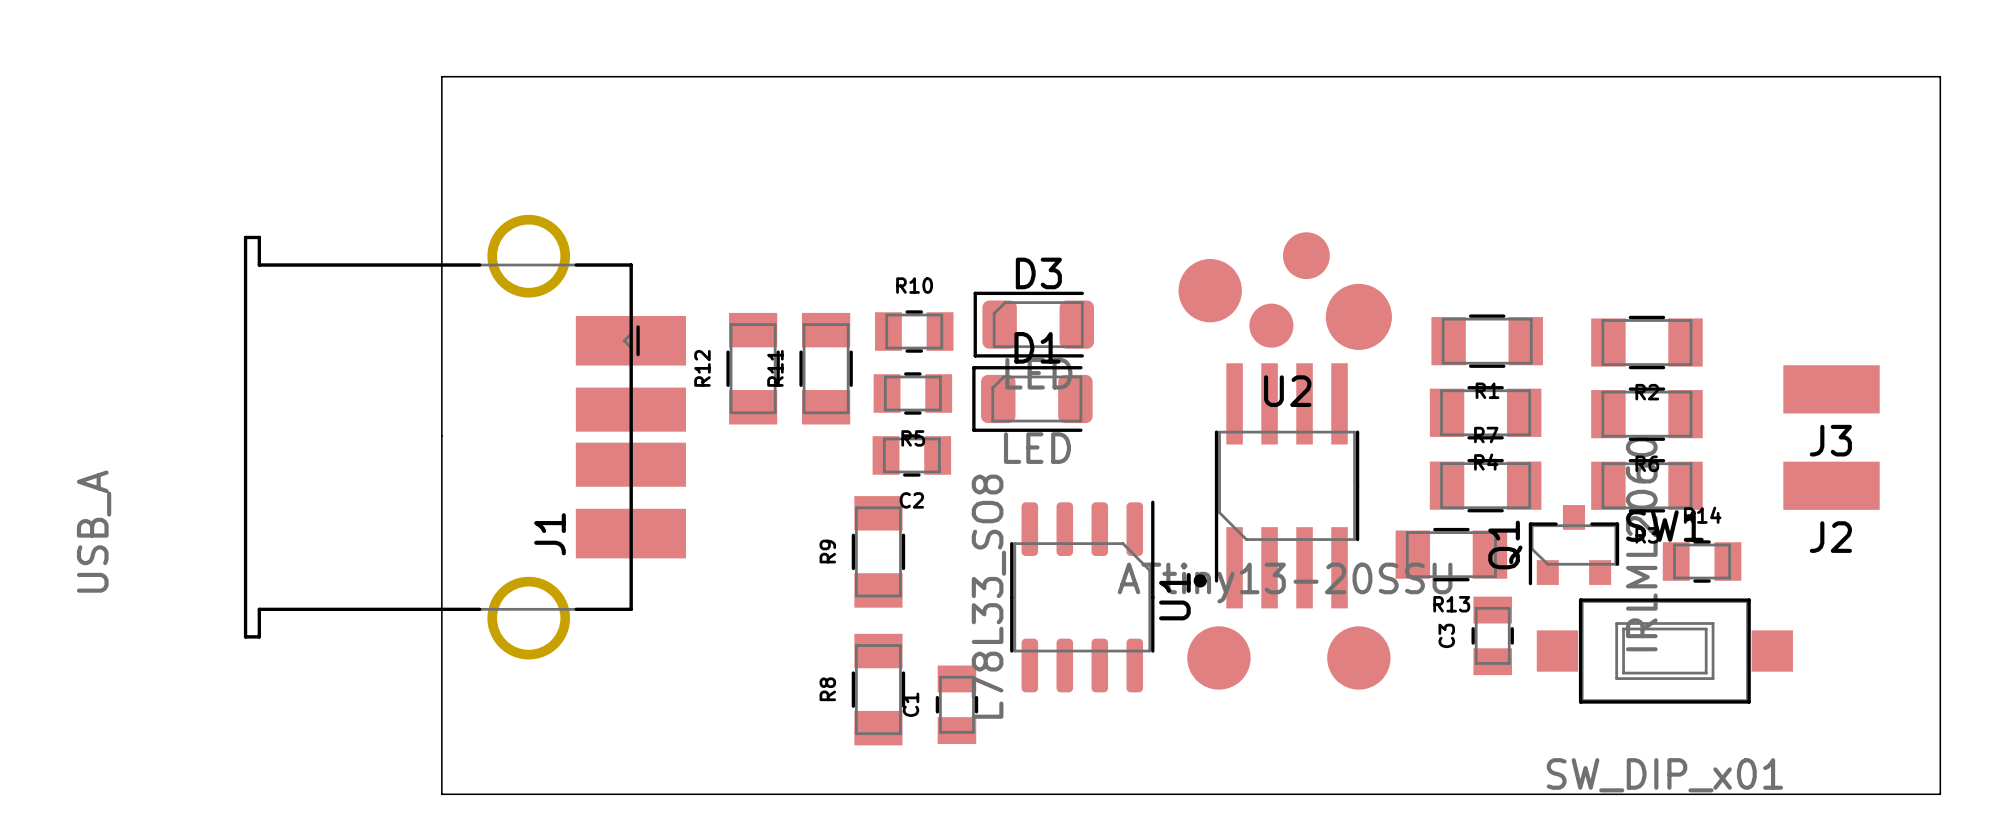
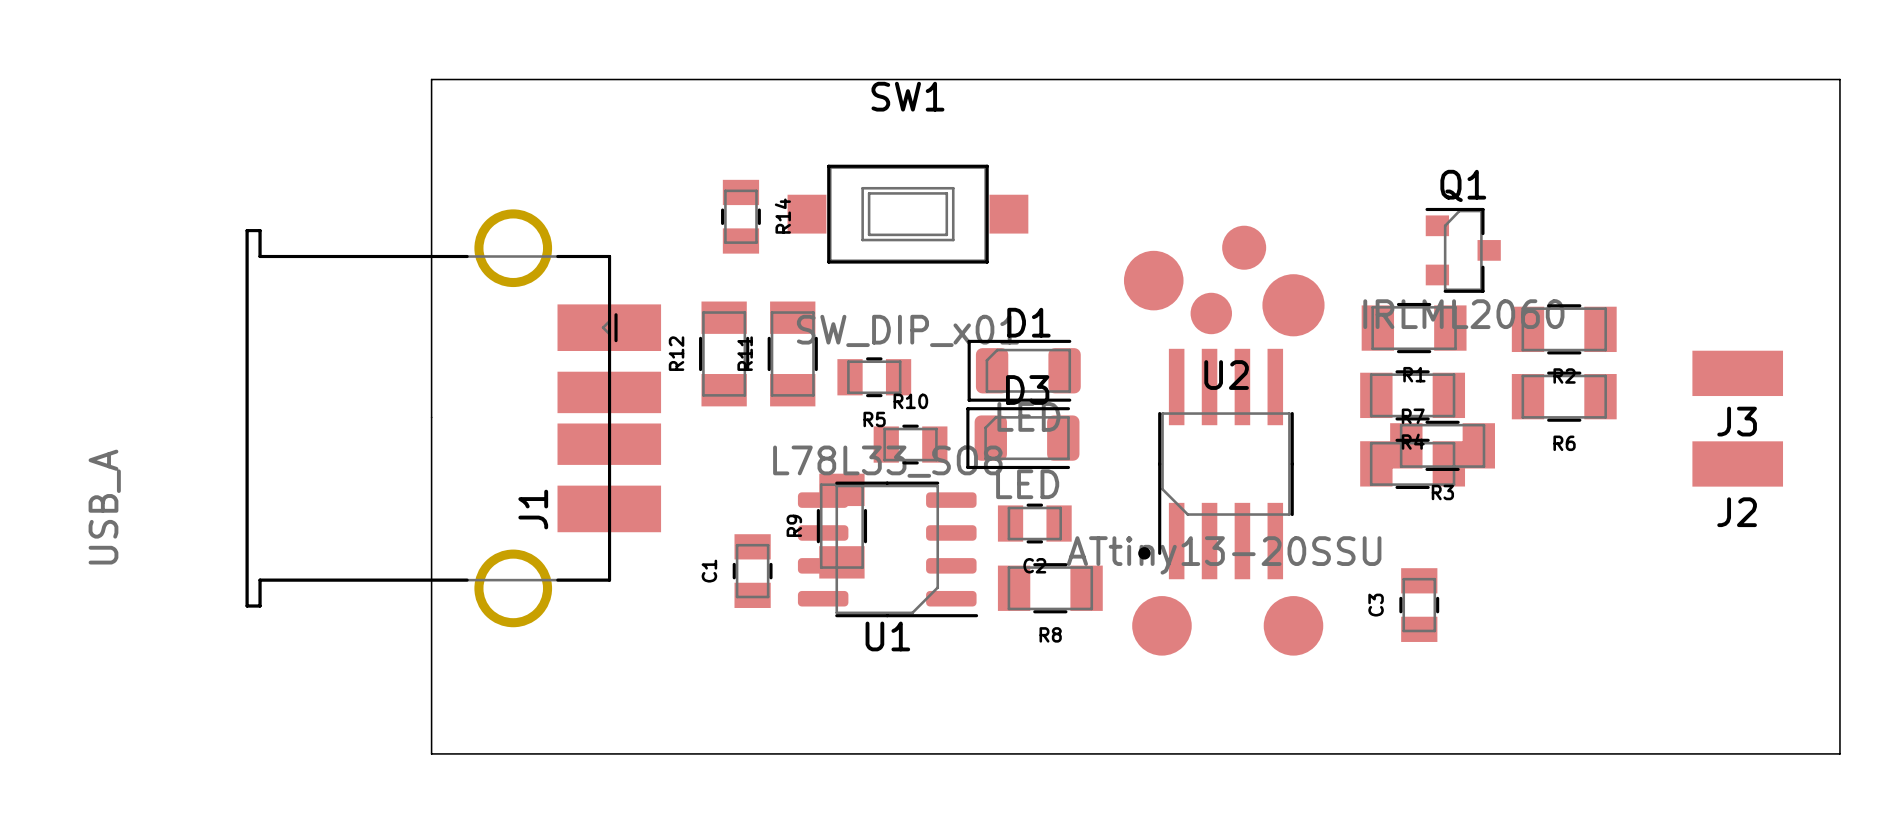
D3 position: (1033, 324) -> (1022, 438)
R10 position: (914, 331) -> (910, 444)
D1 position: (1032, 399) -> (1024, 370)
C2 position: (911, 455) -> (1034, 523)
R3 position: (1646, 485) -> (1442, 445)
Q1 rotation: 0° (1573, 545) -> 90° clockwise (1463, 250)
Q1 position: (1573, 545) -> (1463, 250)
R13: (1451, 554) -> none
R14 rotation: 0° (1702, 561) -> 90° clockwise (740, 216)
R14 position: (1702, 561) -> (740, 216)
U1 rotation: 0° (1082, 596) -> 90° clockwise (888, 549)
U1 position: (1082, 596) -> (888, 549)
SW1 position: (1664, 651) -> (907, 214)
R8 name position: R8 (827, 689) -> R8 (1050, 634)
R8 rotation: 0° (878, 689) -> 90° clockwise (1050, 588)
R8 position: (878, 689) -> (1050, 588)
C1 position: (956, 704) -> (752, 571)

